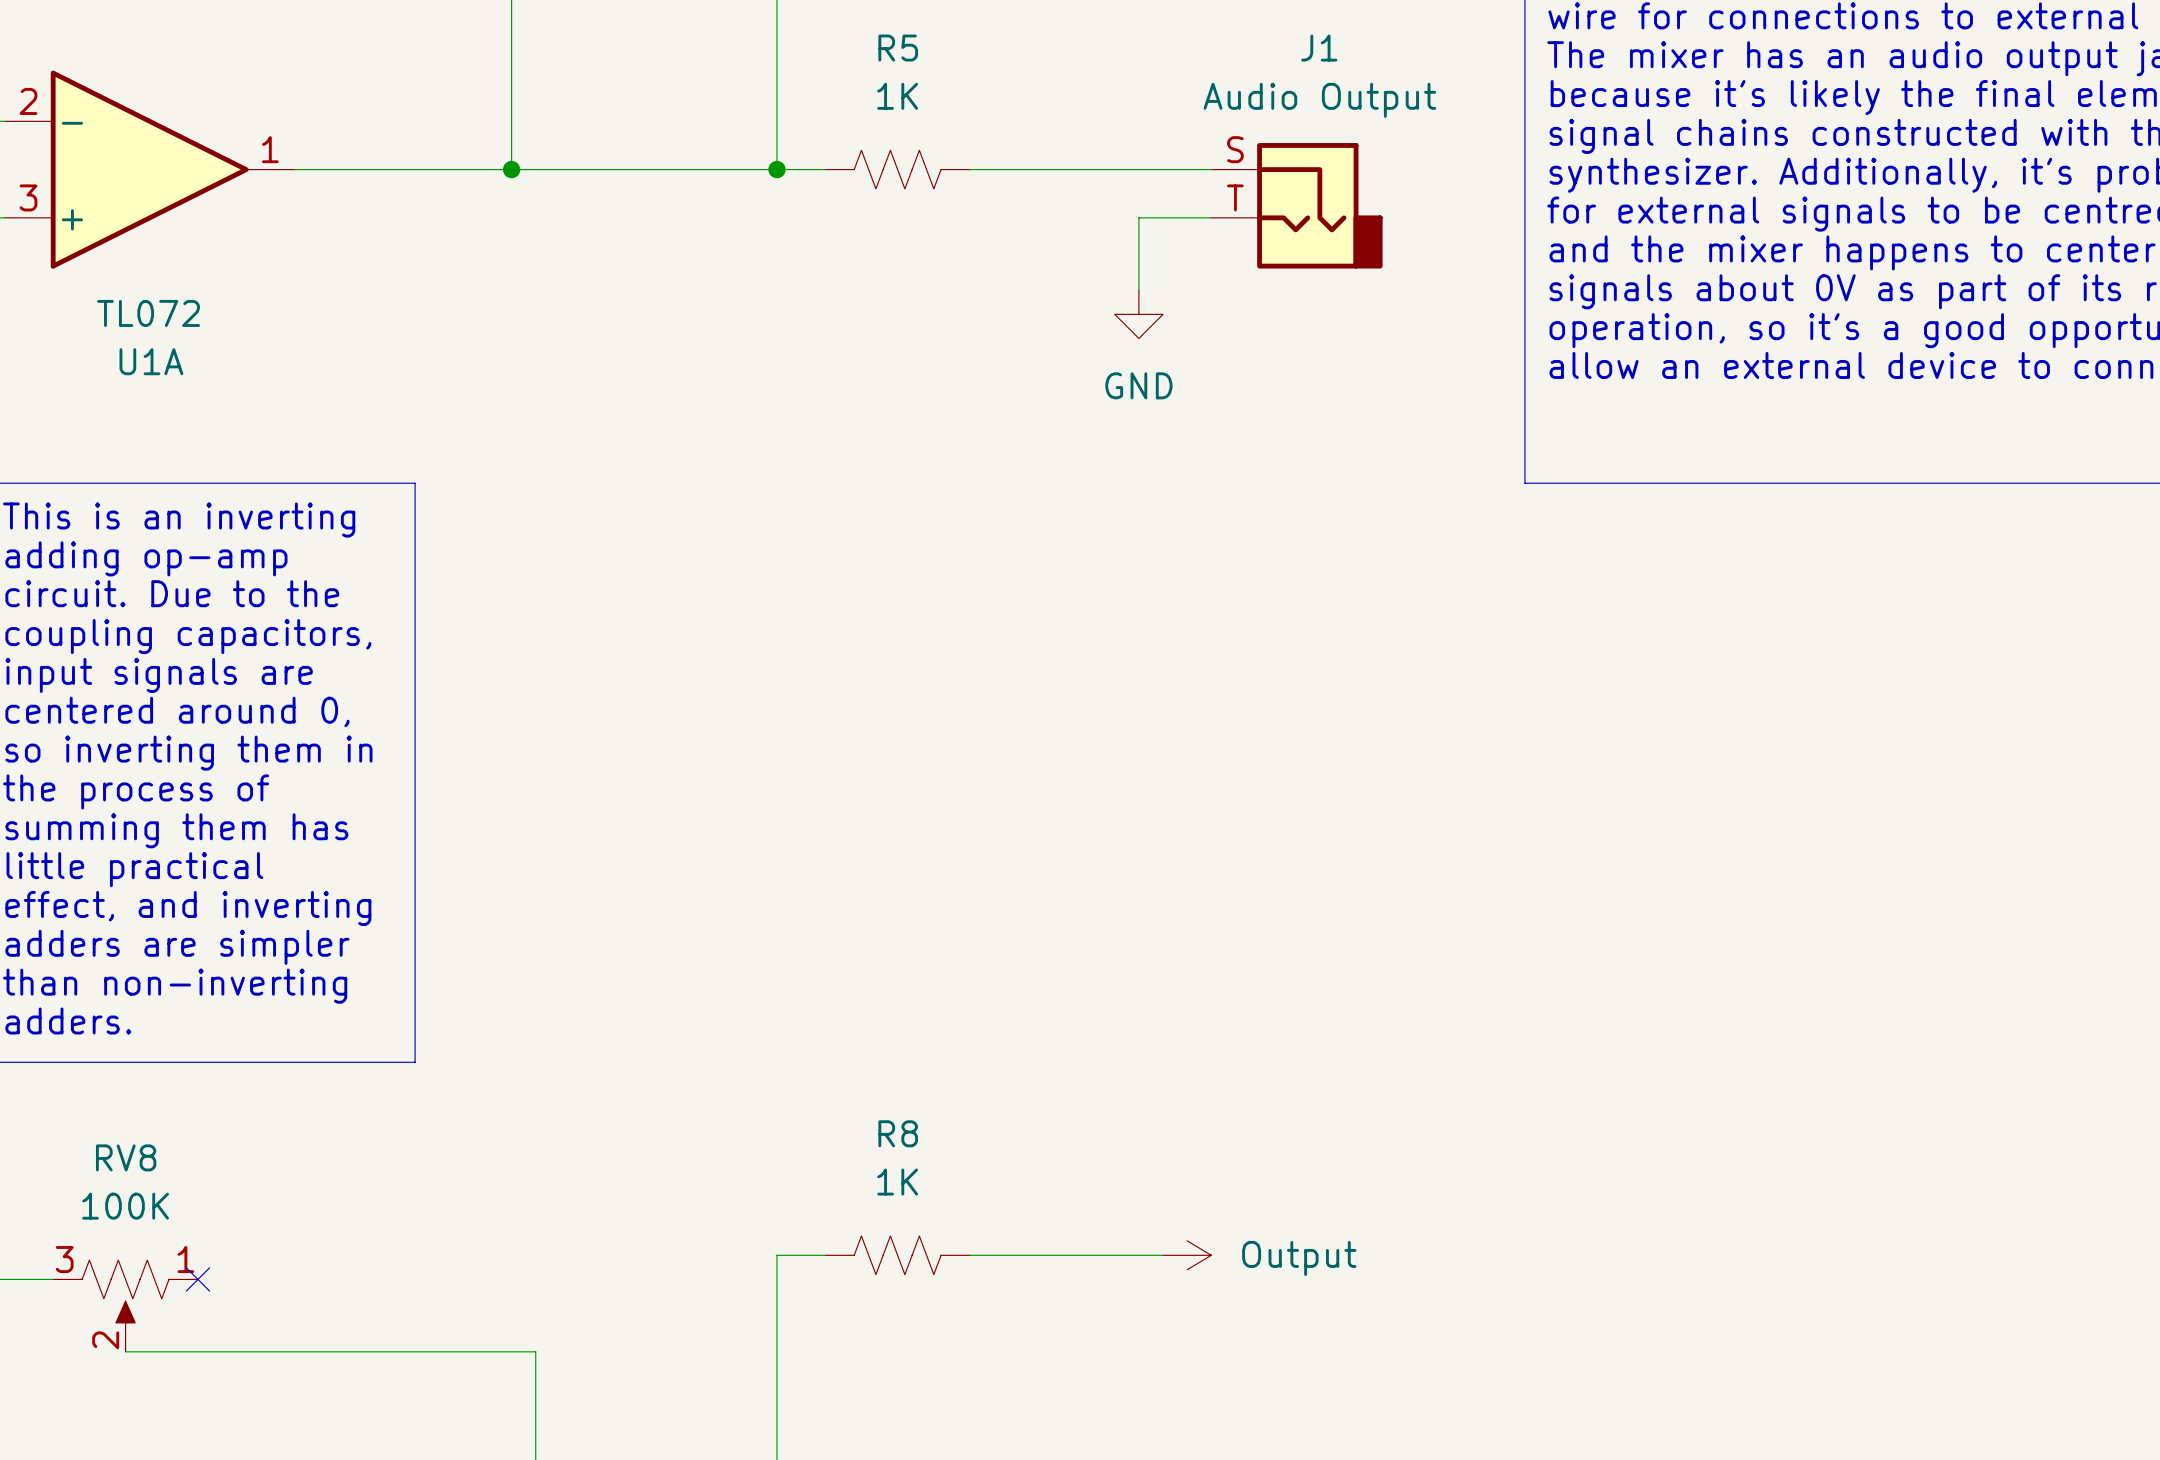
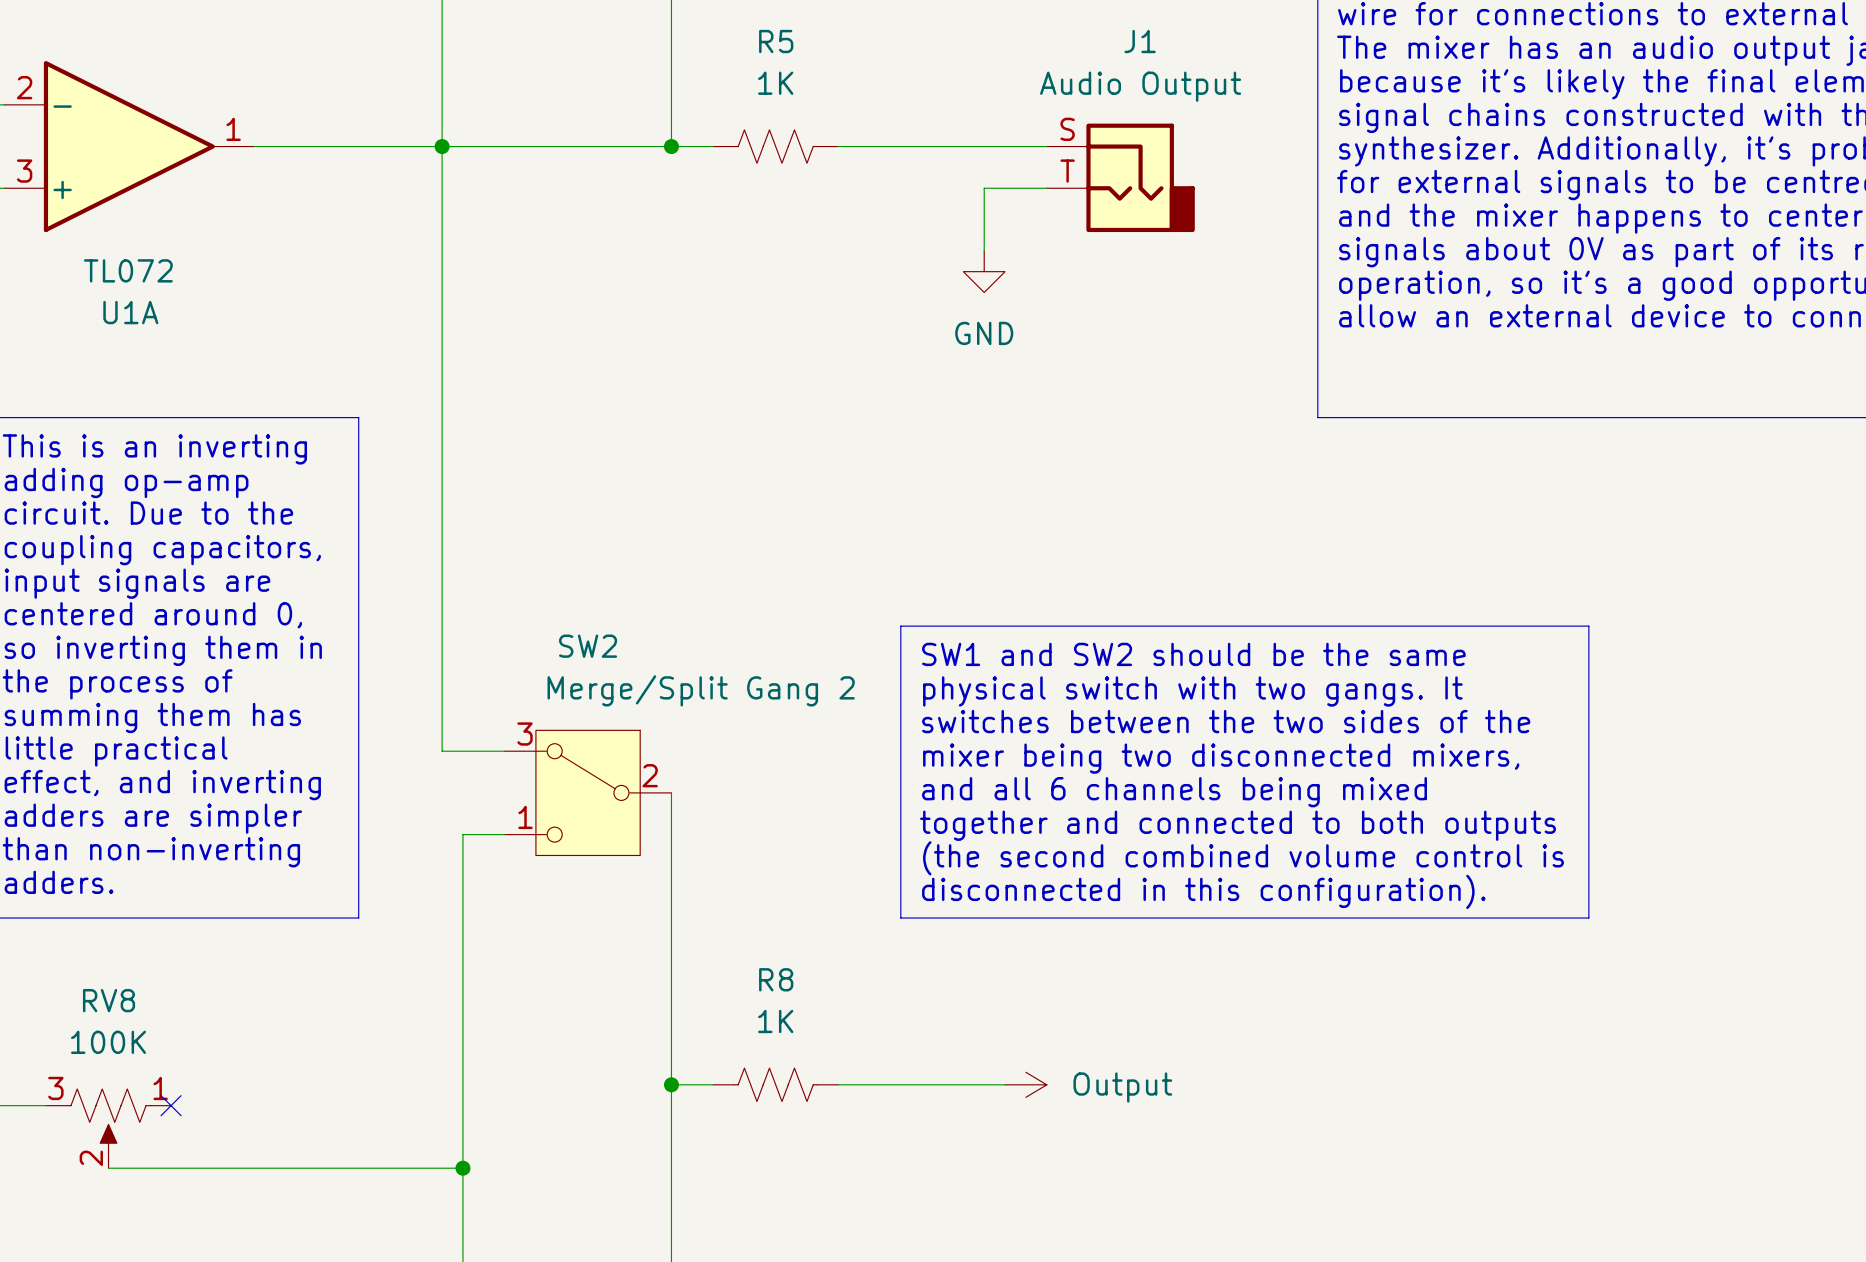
wire: none -> (442, 146) (442, 751) (504, 751)
line: none -> (900, 626) (1588, 626) (1588, 918) (900, 918) (900, 626)
text: none -> SW1 and SW2 should be the same (1193, 654)
text: none -> physical switch with two gangs. It (1192, 691)
text: none -> switches between the two sides of the (1226, 721)
text: none -> mixer being two disconnected mixers, (1221, 758)
text: none -> and all 6 channels being mixed (1174, 792)
SW2: none -> Merge/Split Gang 2 (588, 792)
wire: none -> (671, 792) (671, 1084)
text: none -> together and connected to both outputs (1238, 825)
wire: none -> (504, 834) (462, 834) (462, 1168)
text: none -> (the second combined volume control is (1243, 858)
text: none -> disconnected in this configuration). (1203, 891)
junction: none -> (671, 1084)
junction: none -> (462, 1168)

